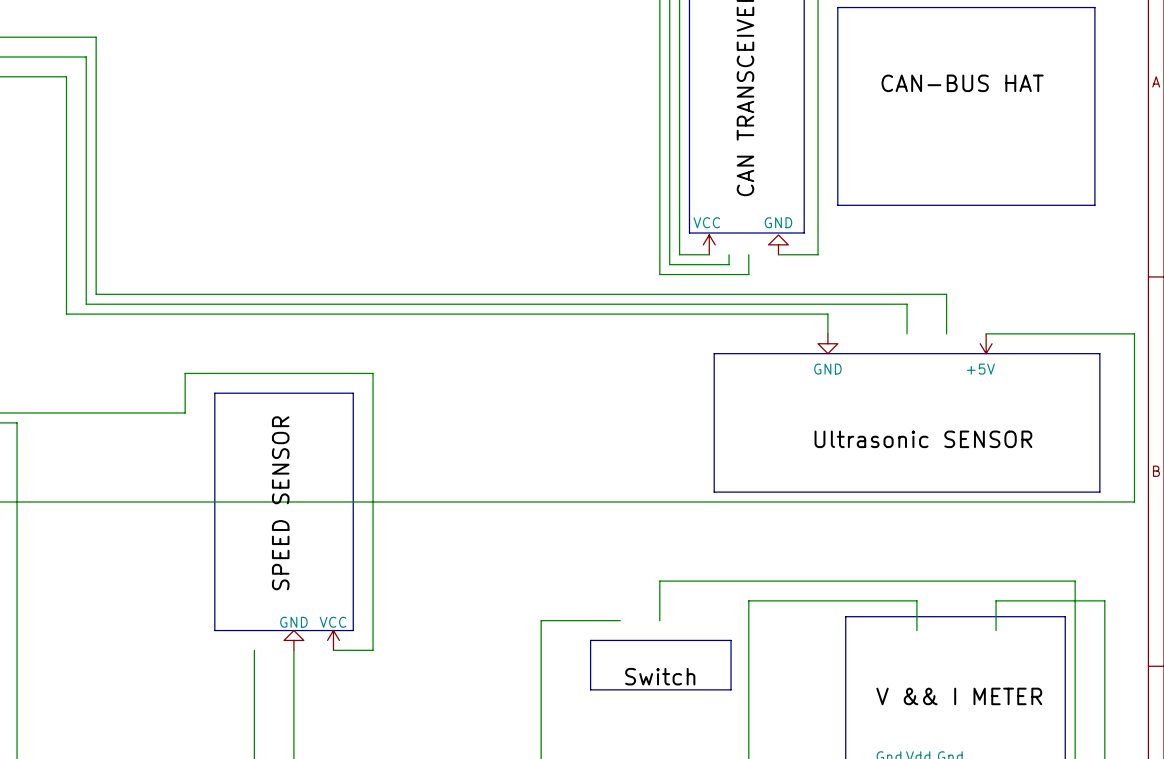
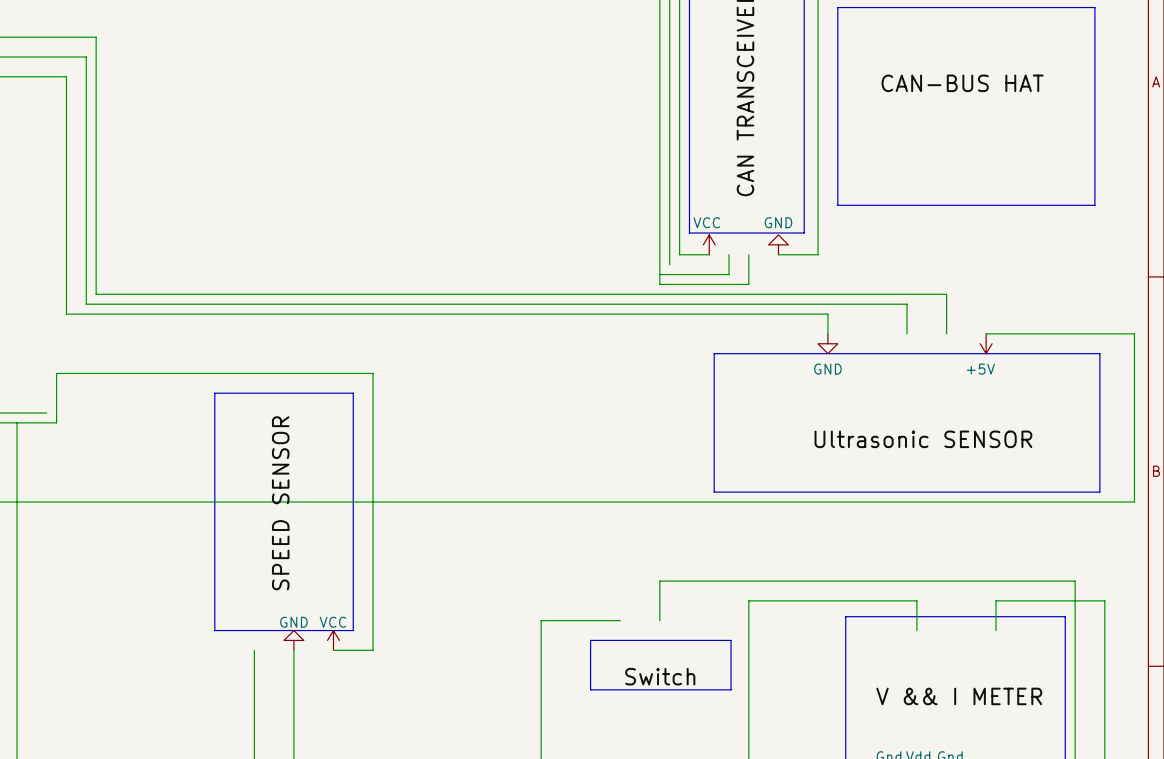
wire: (669, 264) (729, 264) -> none
wire: none -> (659, 274) (659, 284) (748, 284) (748, 274)
wire: (729, 274) (748, 274) -> (729, 274) (729, 264)
wire: (185, 373) (185, 412) (46, 412) -> (185, 373) (56, 373) (56, 422) (17, 422)

